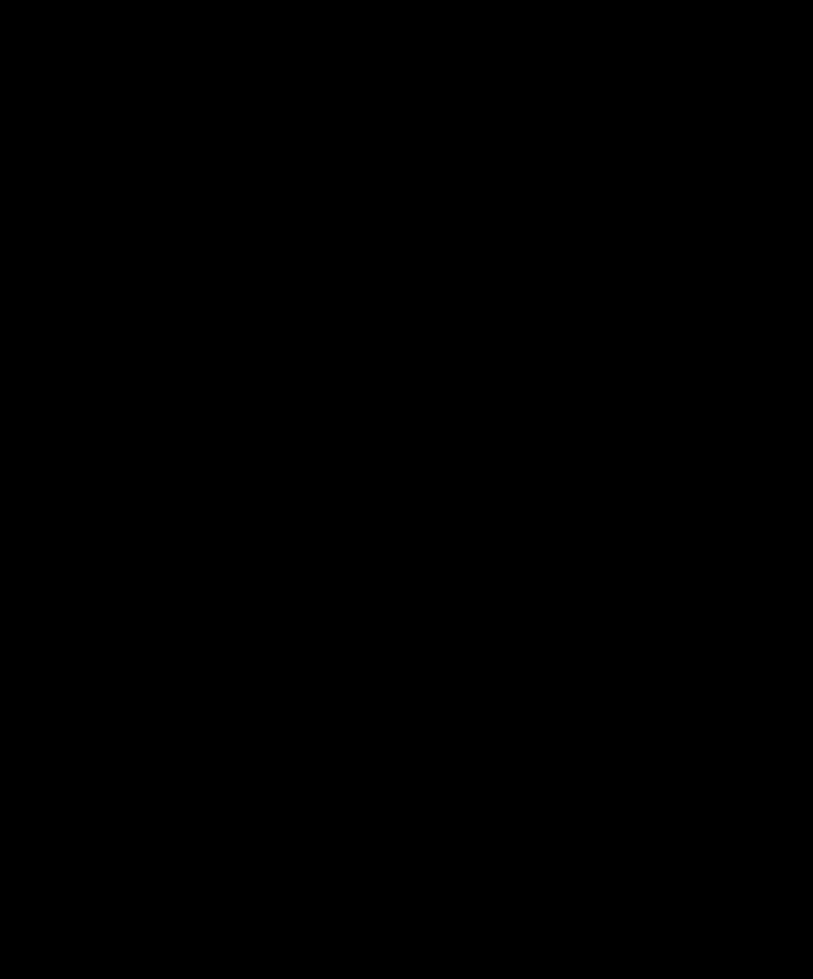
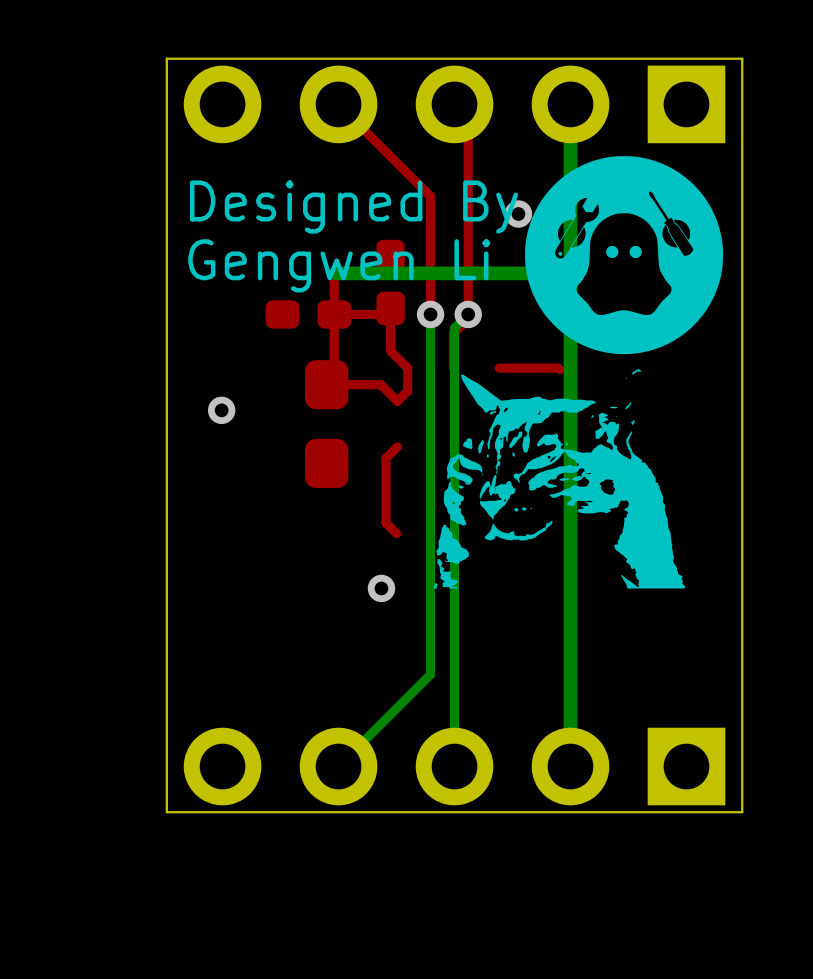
board edge: none -> (742, 58) (166, 58) (166, 812) (742, 812) (742, 58)
top track: none -> (338, 104) (430, 196) (430, 368)
part: none -> (454, 104)
bottom track: none -> (570, 104) (570, 766)
top track: none -> (451, 107) (454, 104) (468, 118) (468, 319) (453, 333) (453, 368)
drawing: none -> [433, 156, 724, 589]
text: none -> Designed By (354, 207)
via: none -> (518, 214)
text: none -> Gengwen Li (339, 265)
top track: none -> (335, 273) (334, 274) (334, 377) (326, 384) (380, 384) (397, 401) (407, 390) (407, 368) (390, 350) (390, 308) (384, 314) (334, 314)
bottom track: none -> (570, 273) (335, 273)
part: none -> (390, 282)
part: none -> (308, 314)
bottom track: none -> (430, 314) (430, 674) (338, 766)
via: none -> (430, 314)
bottom track: none -> (468, 314) (454, 328) (454, 766)
via: none -> (468, 314)
top track: none -> (499, 368) (559, 369)
via: none -> (221, 410)
part: none -> (326, 424)
top track: none -> (397, 446) (385, 458) (385, 522) (396, 533)
via: none -> (381, 588)
part: none -> (454, 766)

